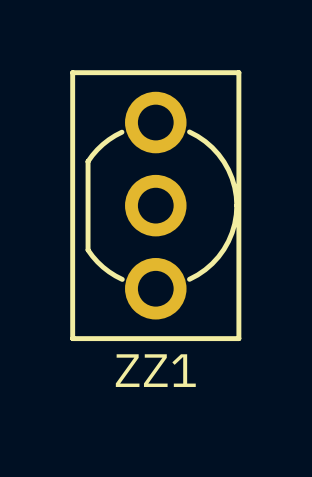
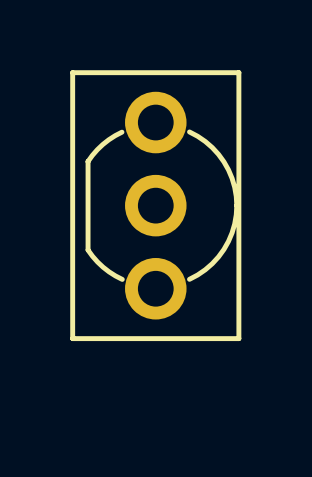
ZZ1 name: ZZ1 (155, 370) -> none

